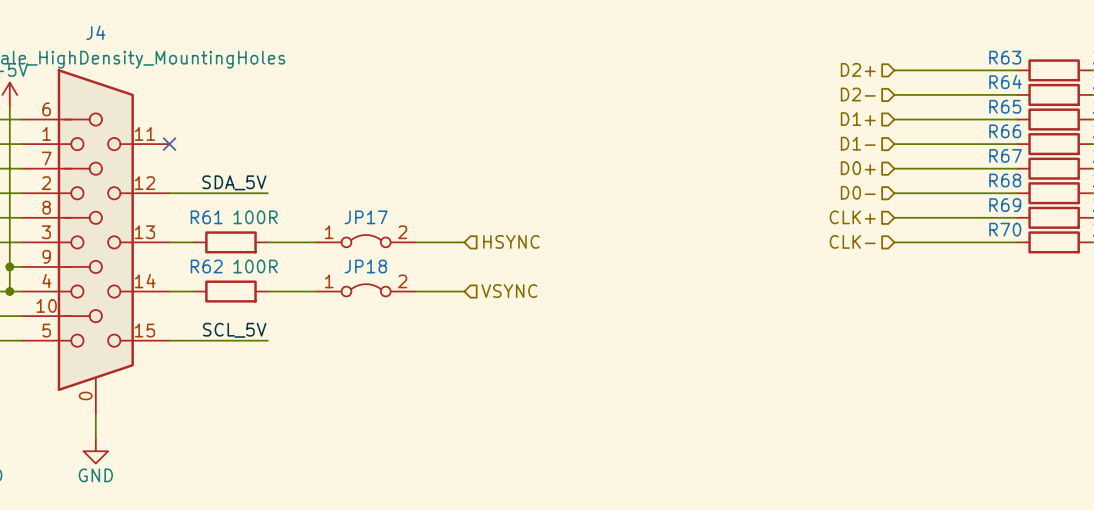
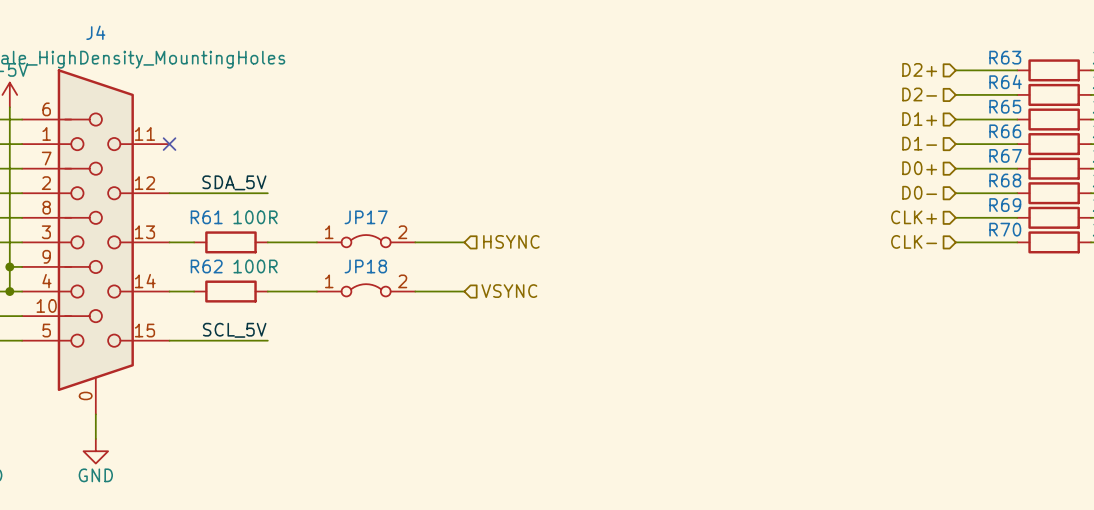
hierarchical label position: D2+ (858, 69) -> D2+ (919, 69)
wire: (894, 70) (955, 70) -> none
hierarchical label position: D2- (858, 94) -> D2- (919, 94)
wire: (894, 94) (955, 94) -> none
hierarchical label position: D1+ (858, 119) -> D1+ (919, 119)
wire: (894, 119) (955, 119) -> none
hierarchical label position: D1- (858, 143) -> D1- (919, 143)
wire: (894, 144) (955, 144) -> none
hierarchical label position: D0+ (858, 168) -> D0+ (919, 168)
wire: (894, 168) (955, 168) -> none
hierarchical label position: D0- (858, 192) -> D0- (919, 192)
wire: (894, 193) (955, 193) -> none
hierarchical label position: CLK+ (852, 217) -> CLK+ (914, 217)
wire: (894, 217) (955, 217) -> none
hierarchical label position: CLK- (852, 241) -> CLK- (914, 241)
wire: (894, 242) (955, 242) -> none

